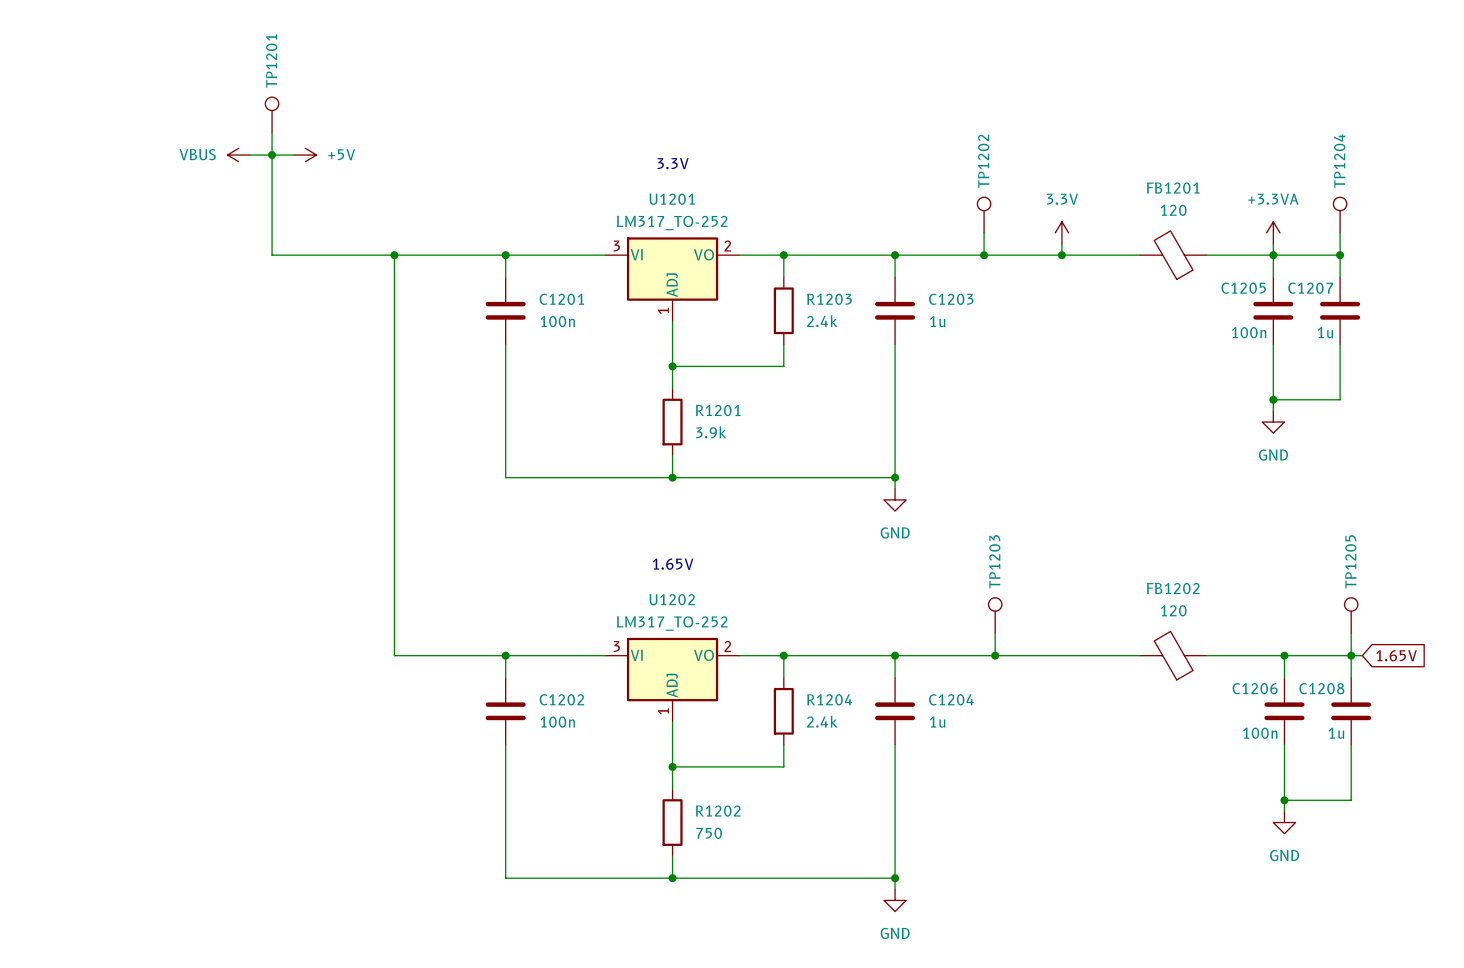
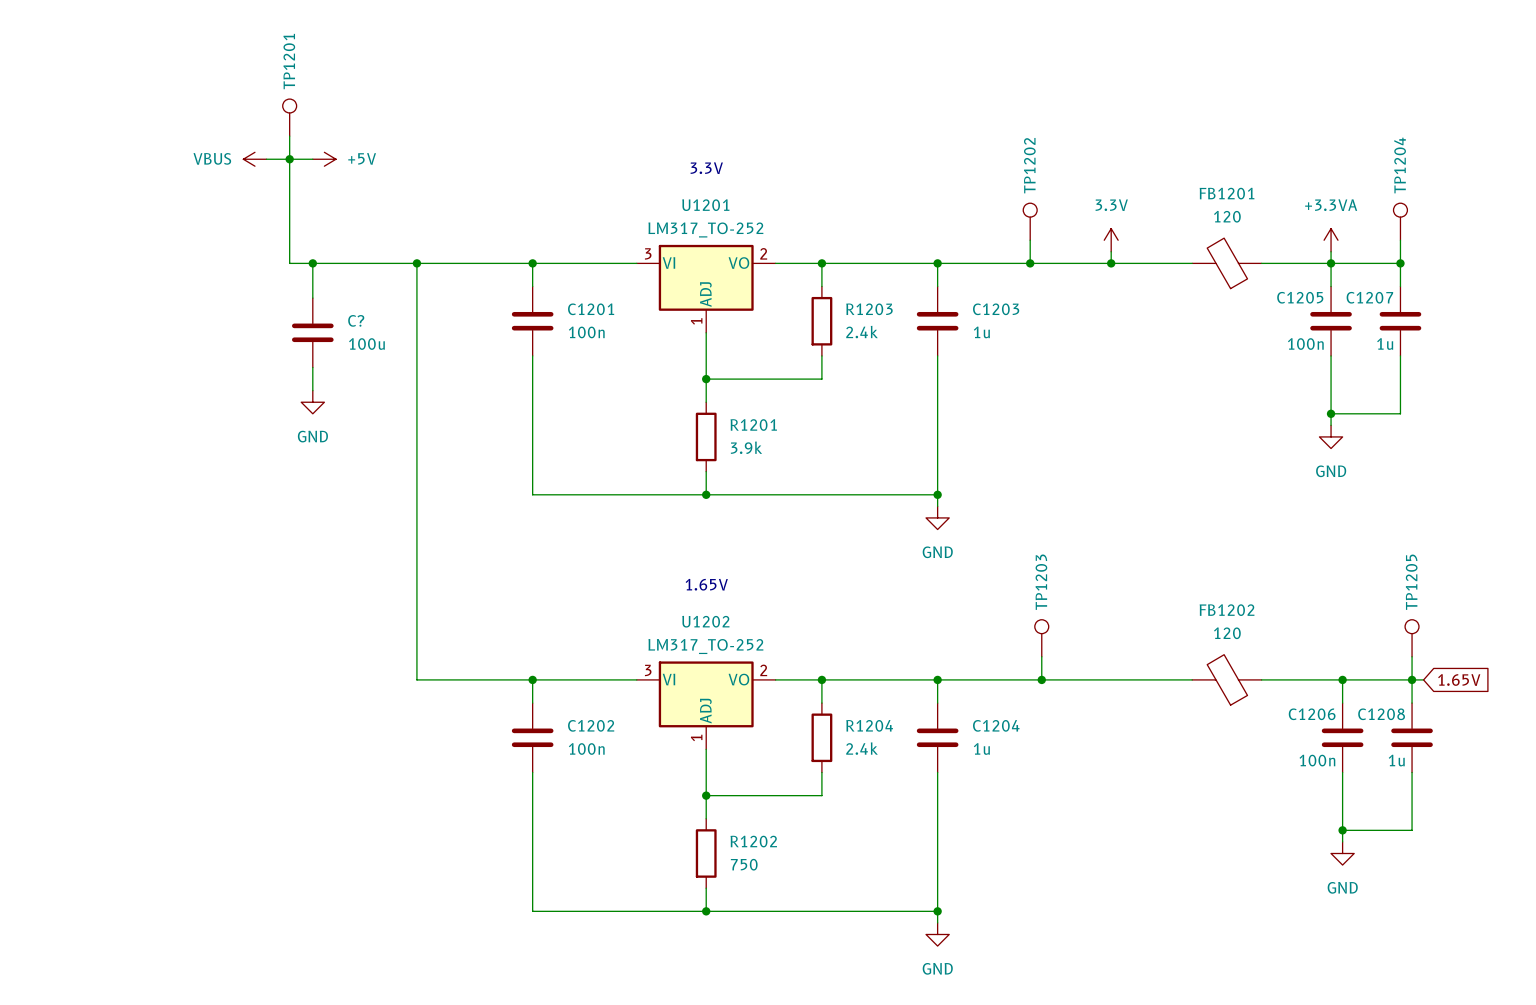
wire: none -> (312, 263) (312, 298)
junction: none -> (312, 263)
C?: none -> 100u (312, 332)
wire: none -> (312, 367) (312, 390)
power symbol: none -> GND (312, 402)

